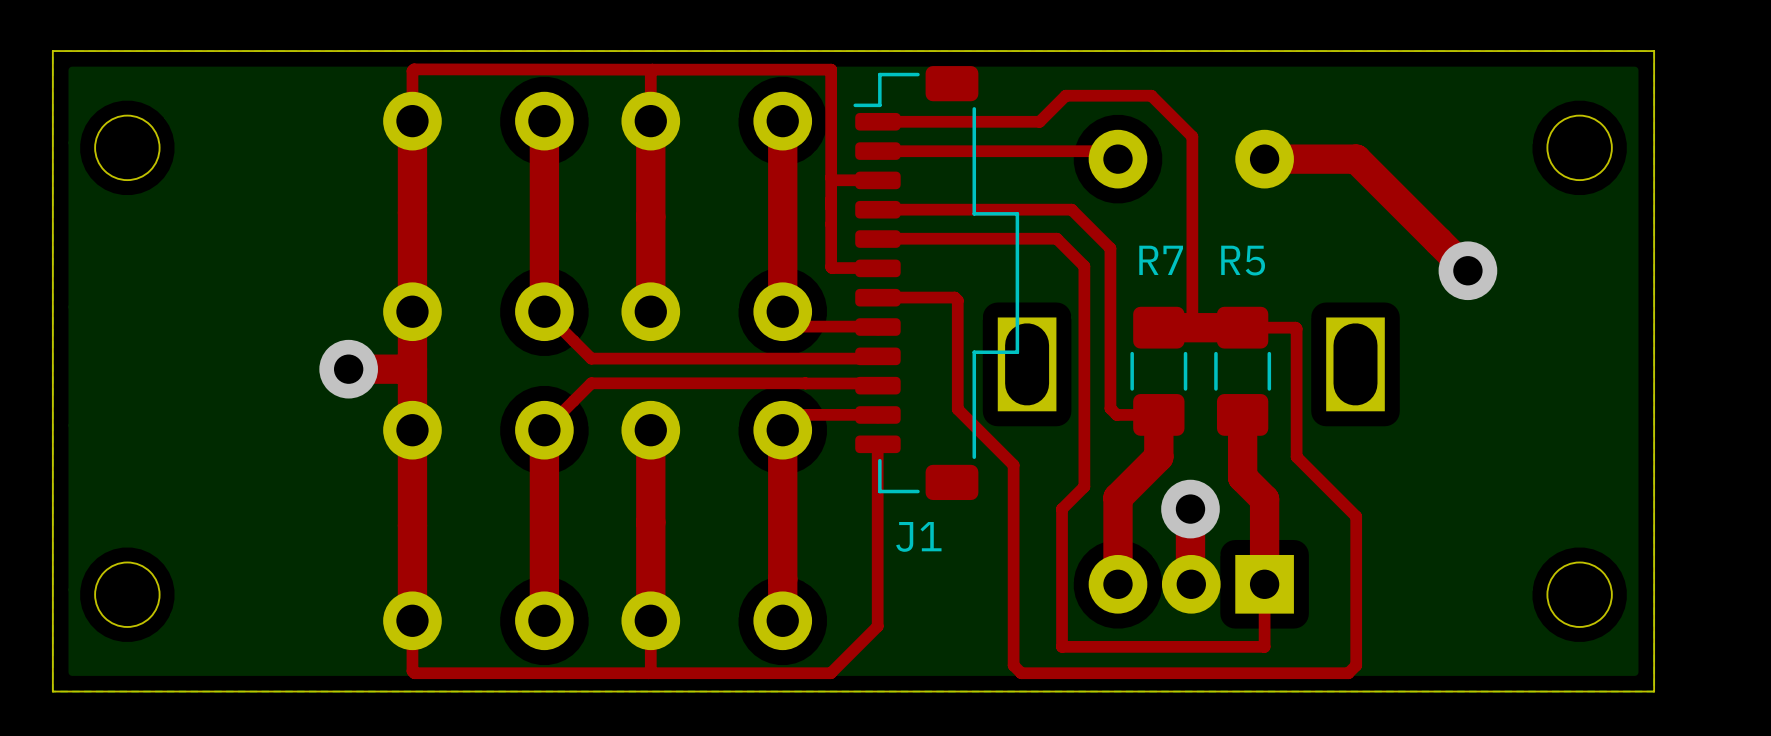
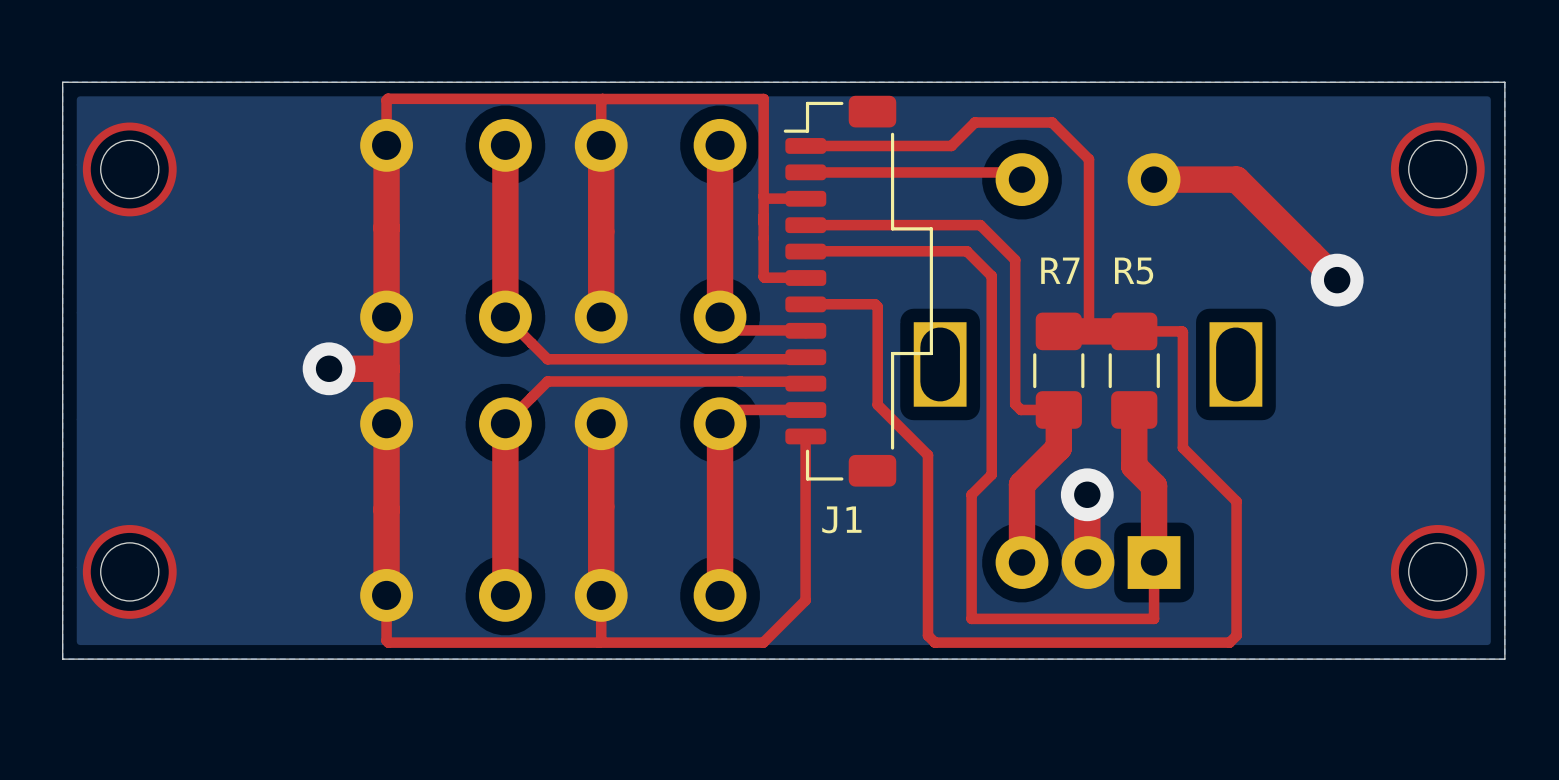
drawing: none -> [82, 122, 177, 217]
drawing: none -> [1390, 122, 1485, 217]
drawing: none -> [82, 525, 177, 619]
drawing: none -> [1390, 525, 1485, 619]

